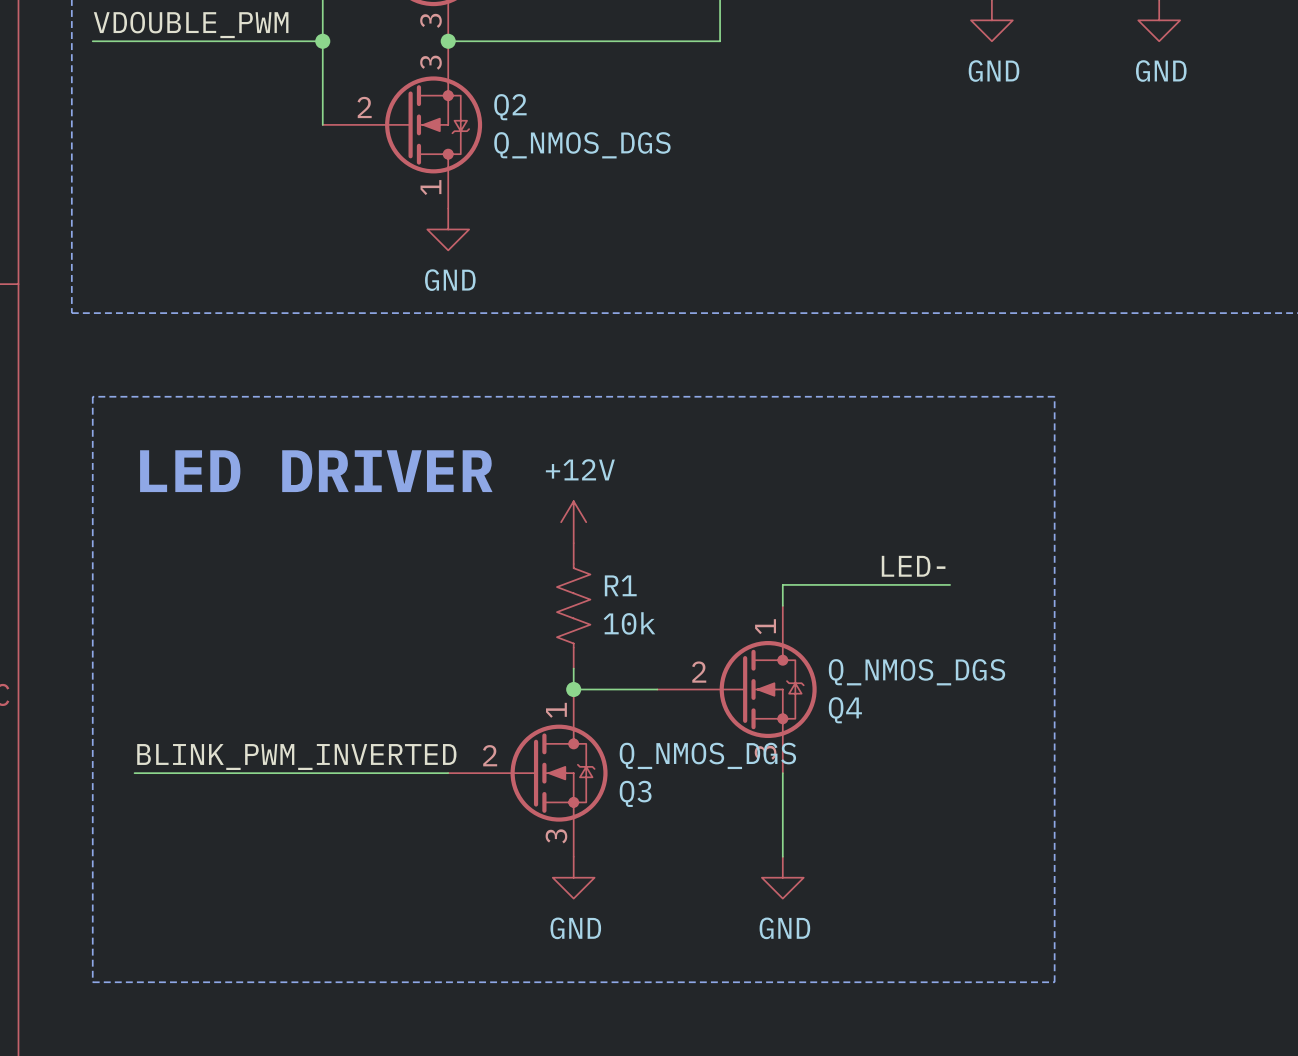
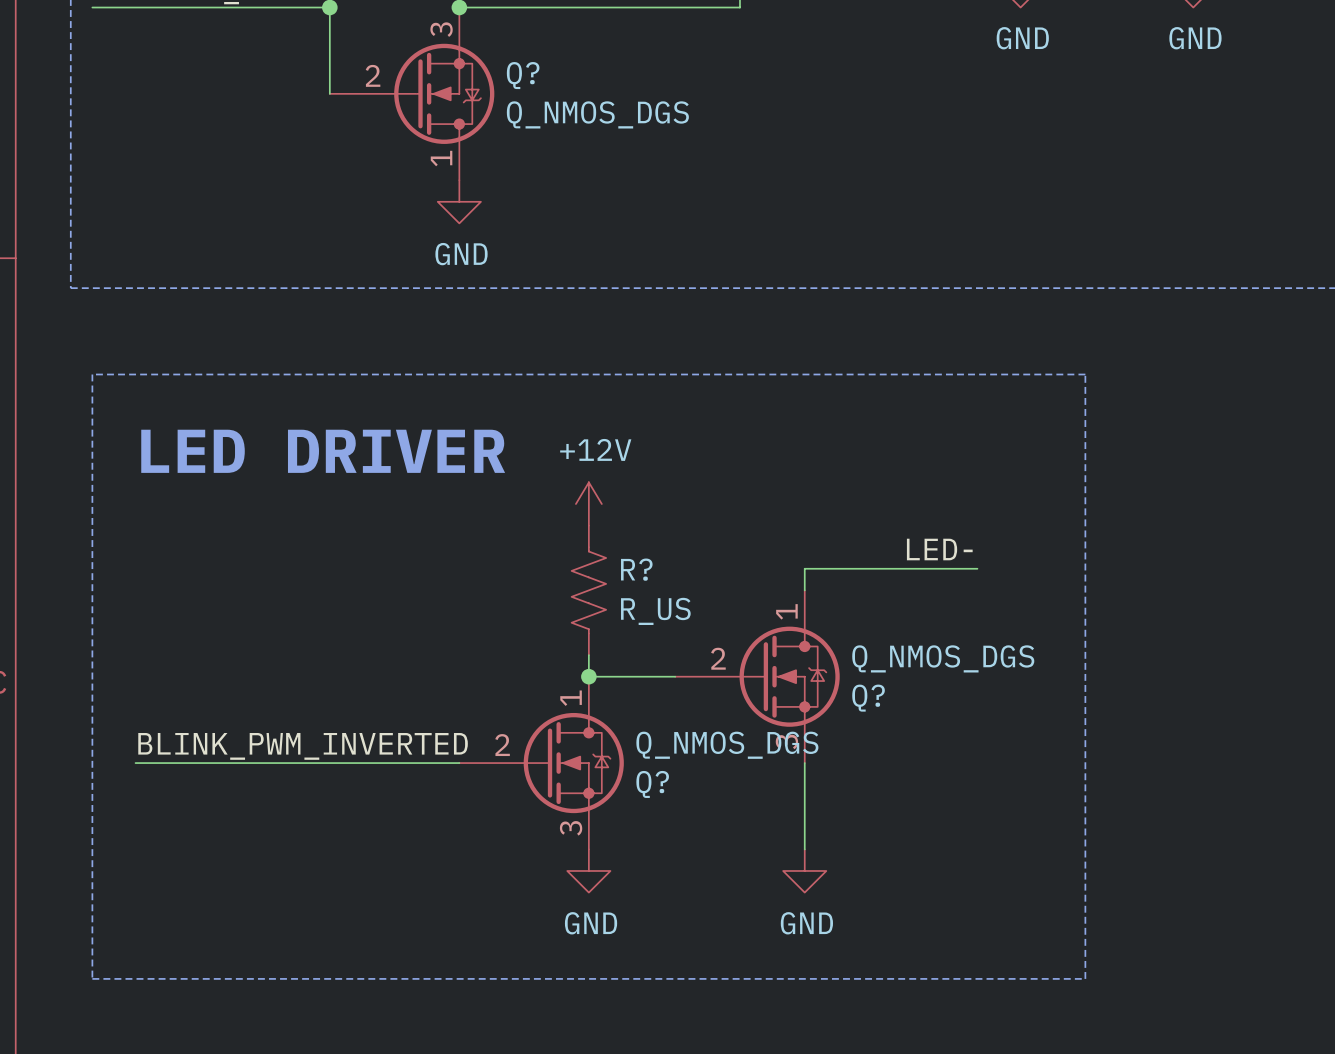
Q2 name: Q2 (510, 107) -> Q? (523, 75)
R1 name: R1 (620, 585) -> R? (636, 569)
R1 value: 10k (629, 623) -> R_US (655, 611)
Q4 name: Q4 (845, 710) -> Q? (868, 698)
Q3 name: Q3 (635, 793) -> Q? (652, 784)

